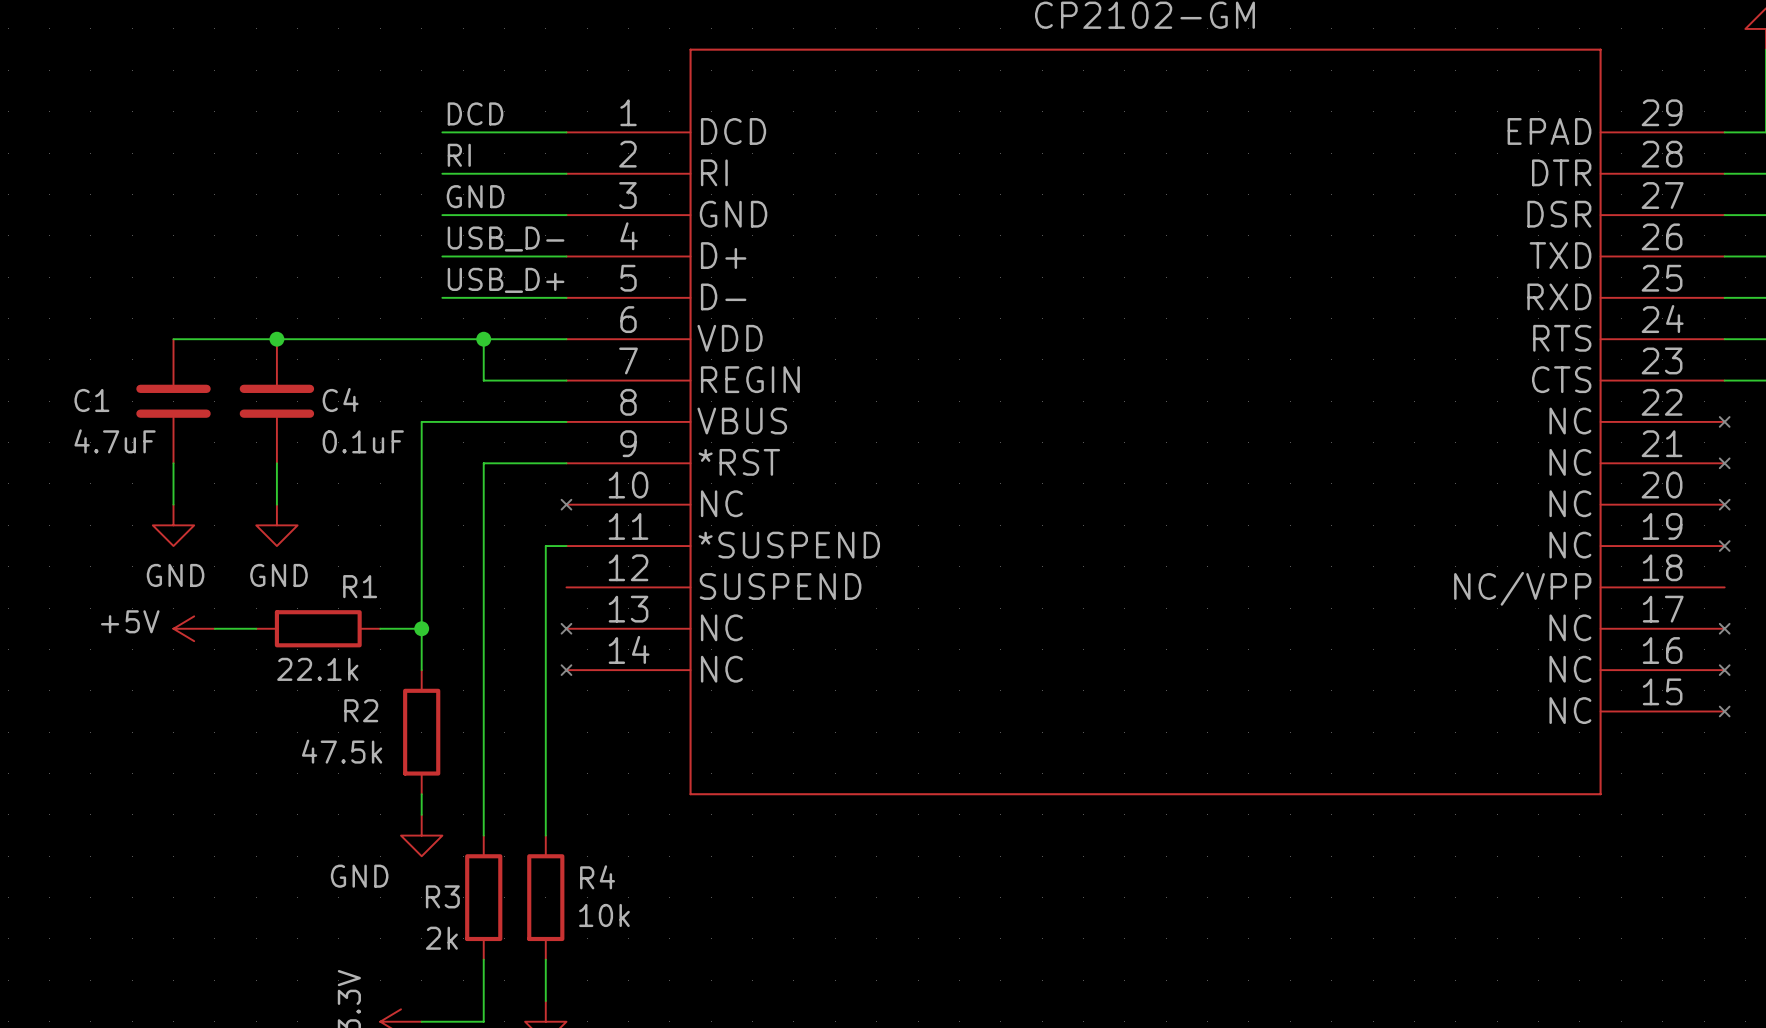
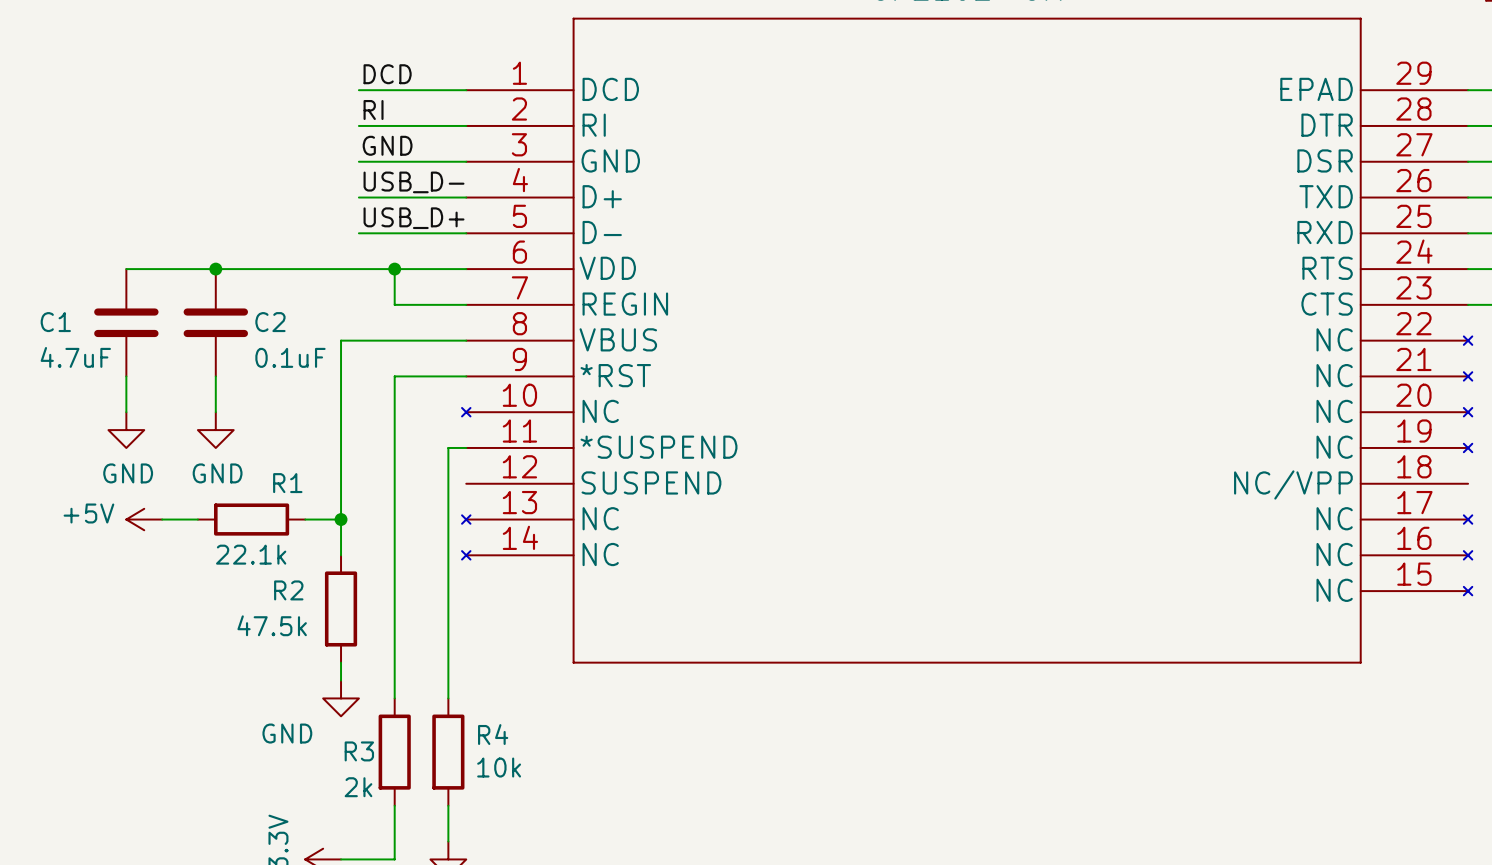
C4 name: C4 (340, 399) -> C2 (270, 322)

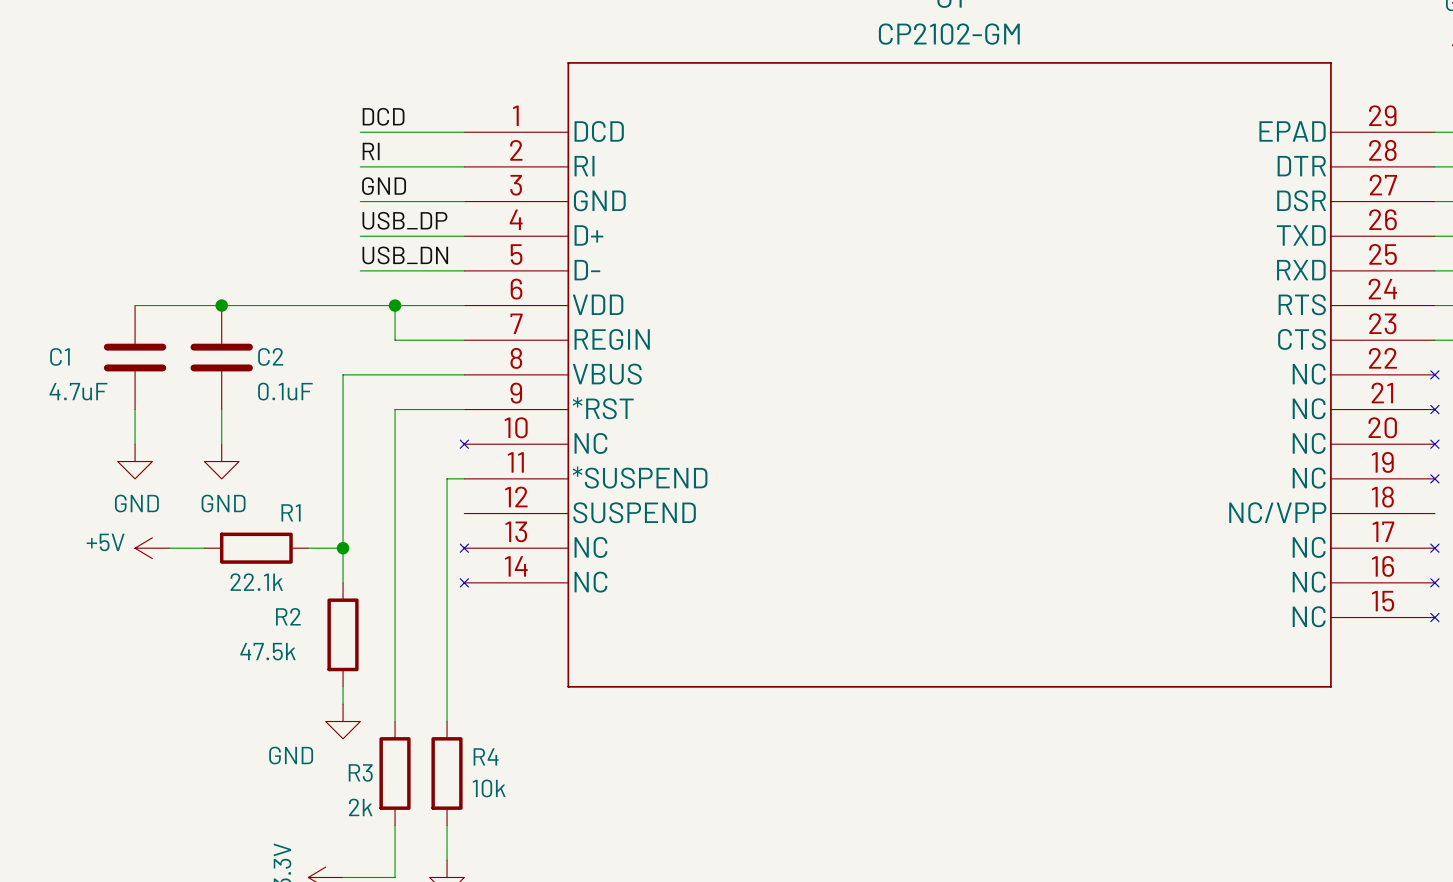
label: USB_D- (414, 182) -> USB_DP (404, 220)
label: USB_D+ (414, 218) -> USB_DN (405, 255)

